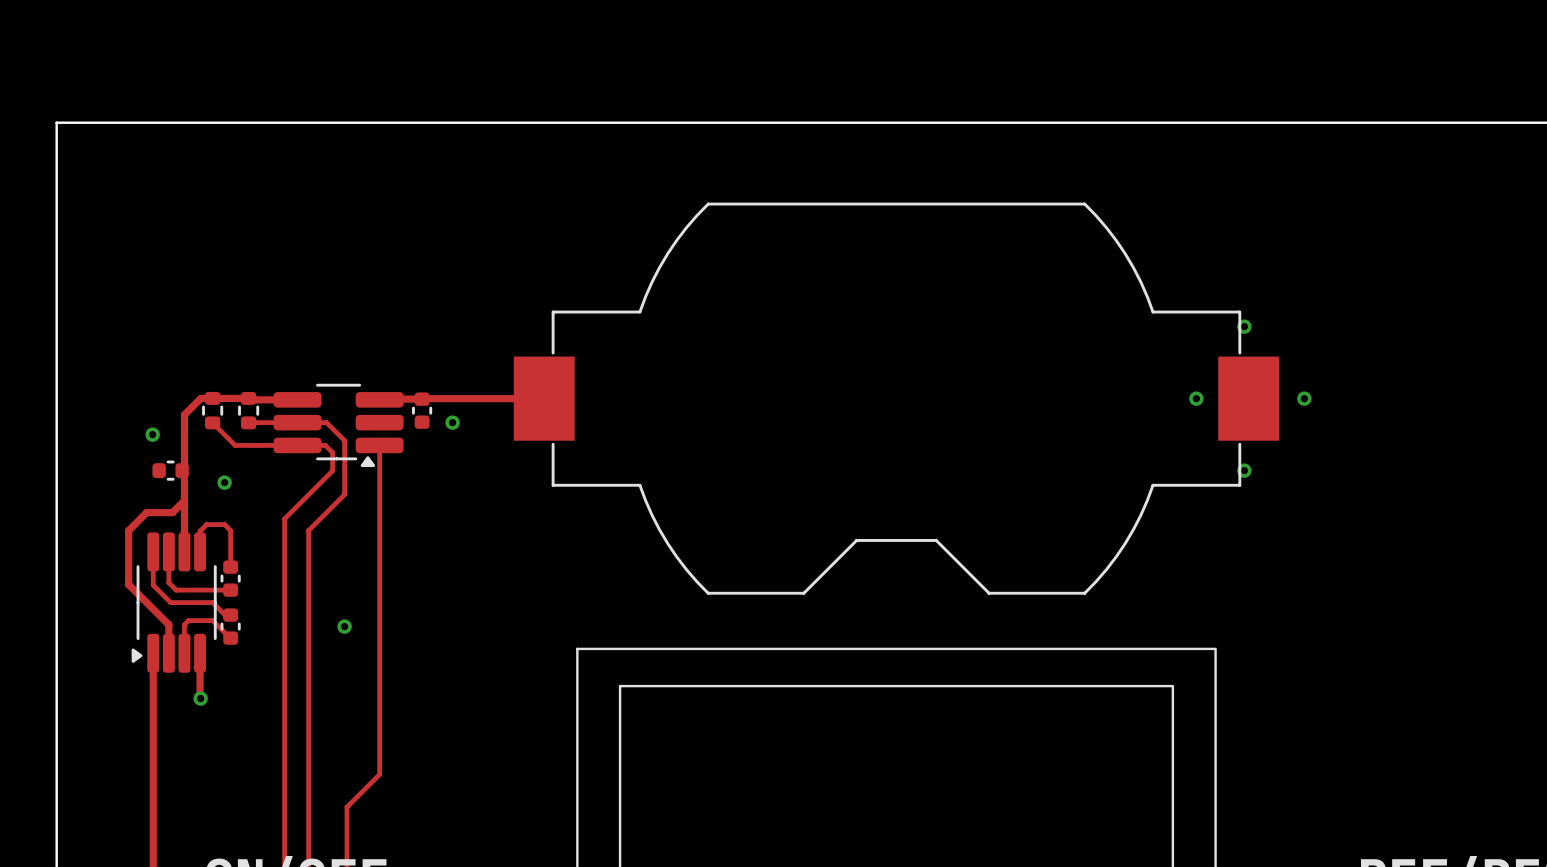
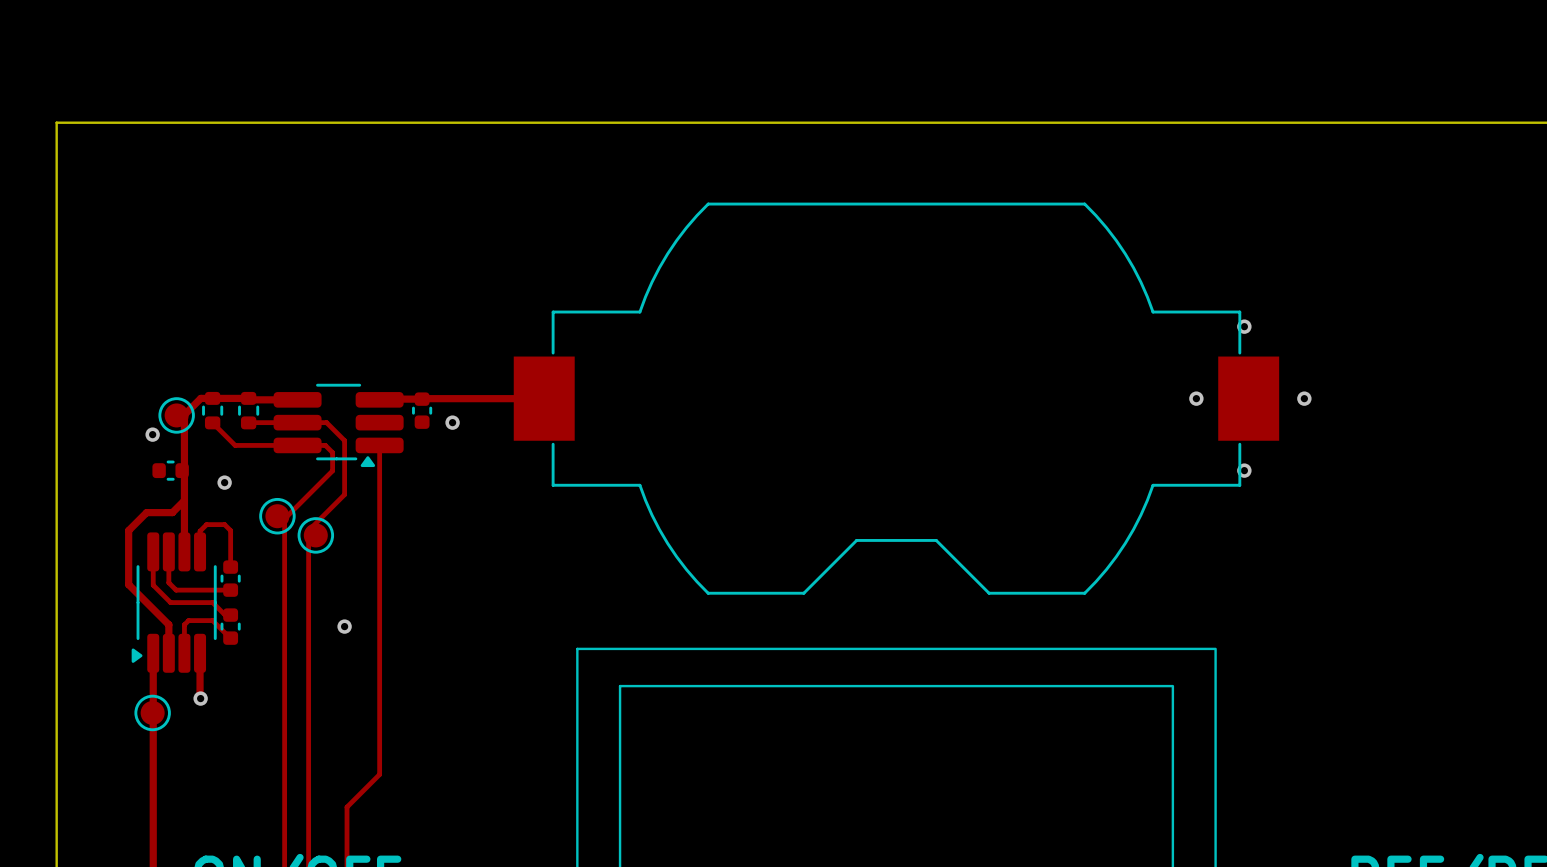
part: none -> (176, 415)
part: none -> (277, 516)
part: none -> (315, 535)
part: none -> (152, 712)

